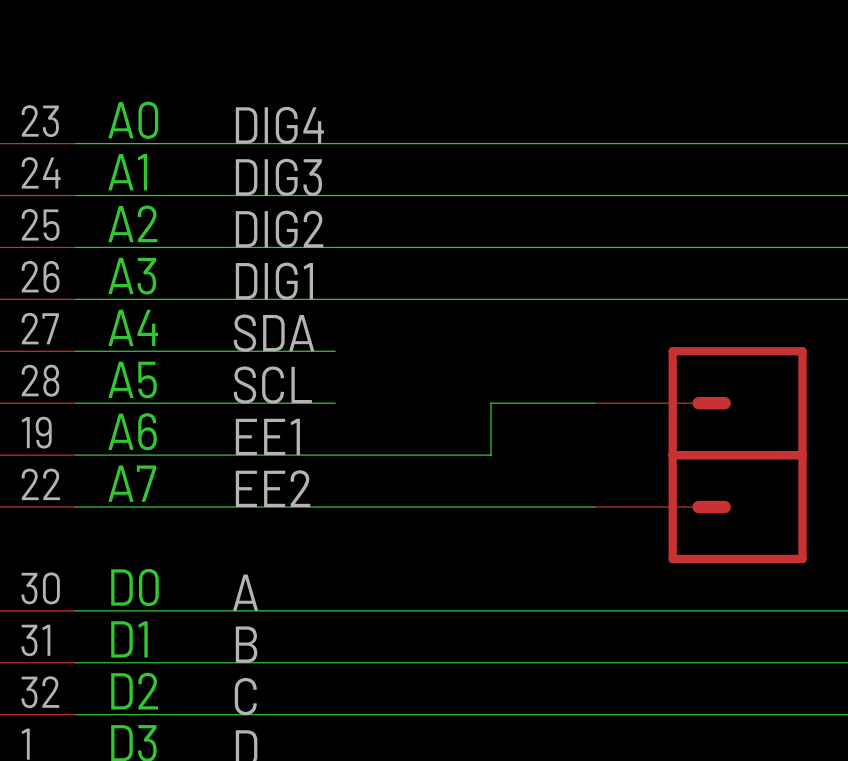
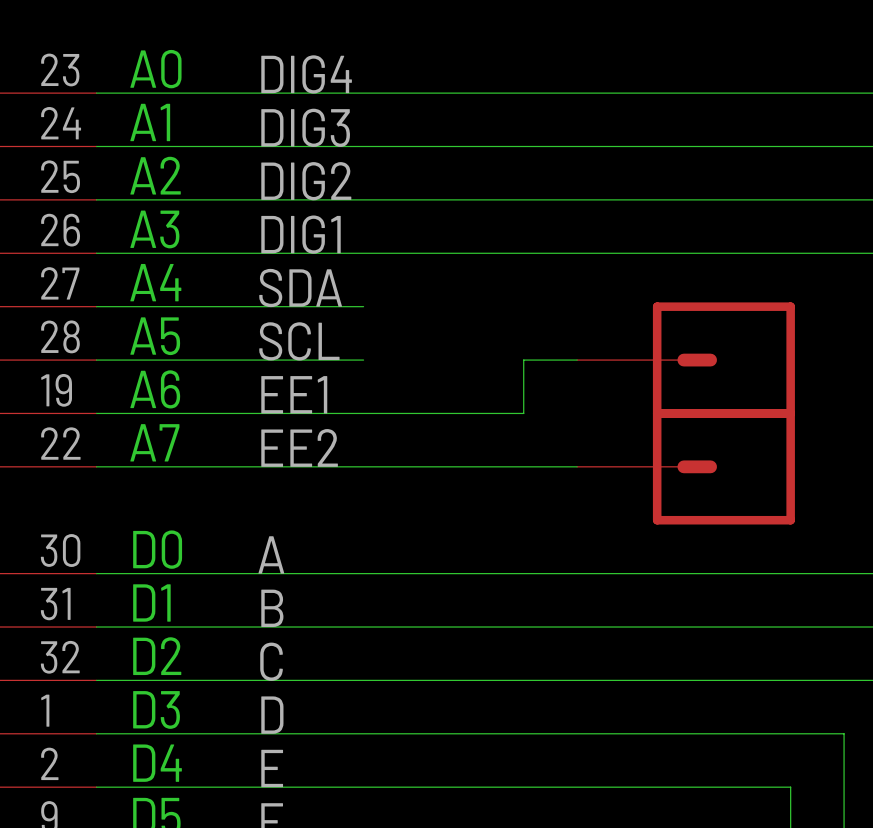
part position: (700, 403) -> (686, 360)
part position: (700, 507) -> (686, 466)

